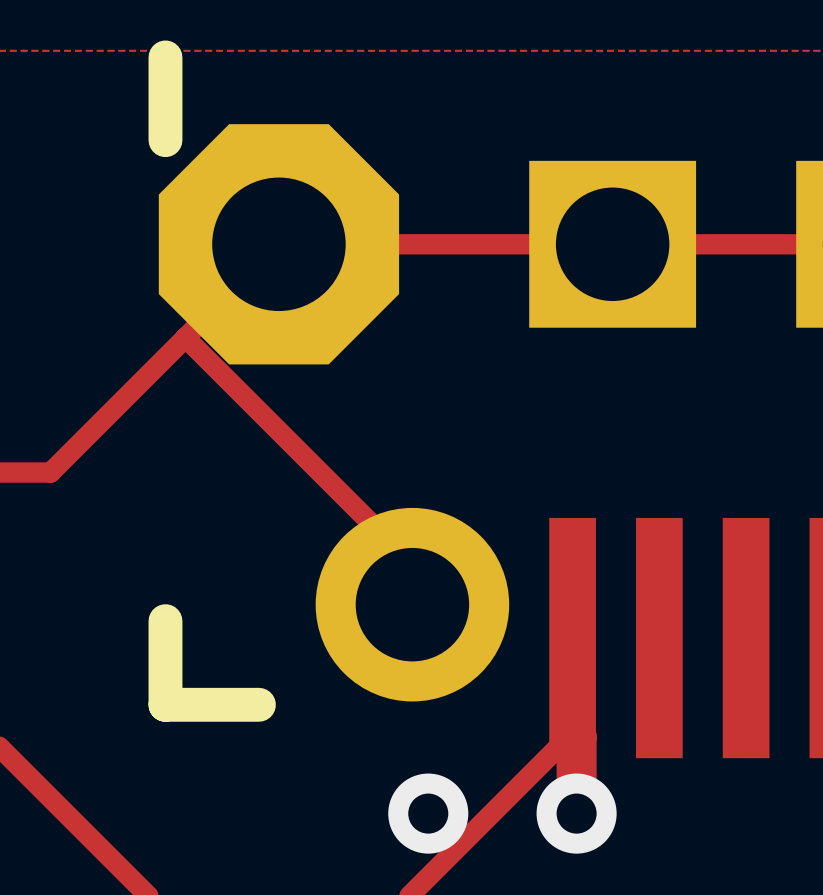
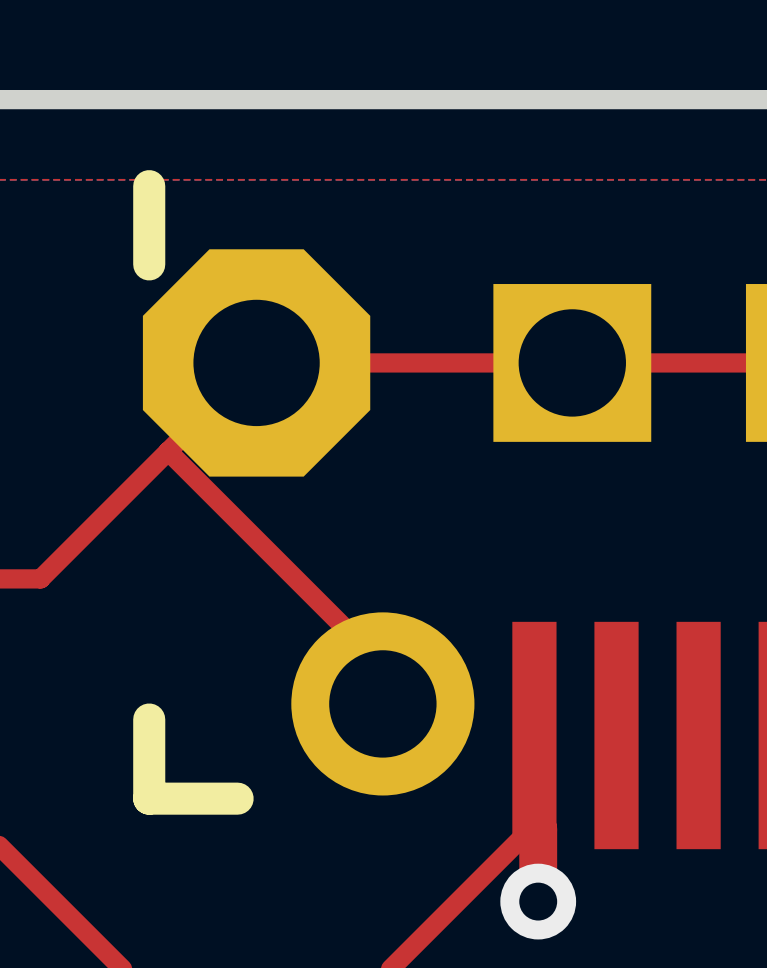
via: (428, 813) -> none

